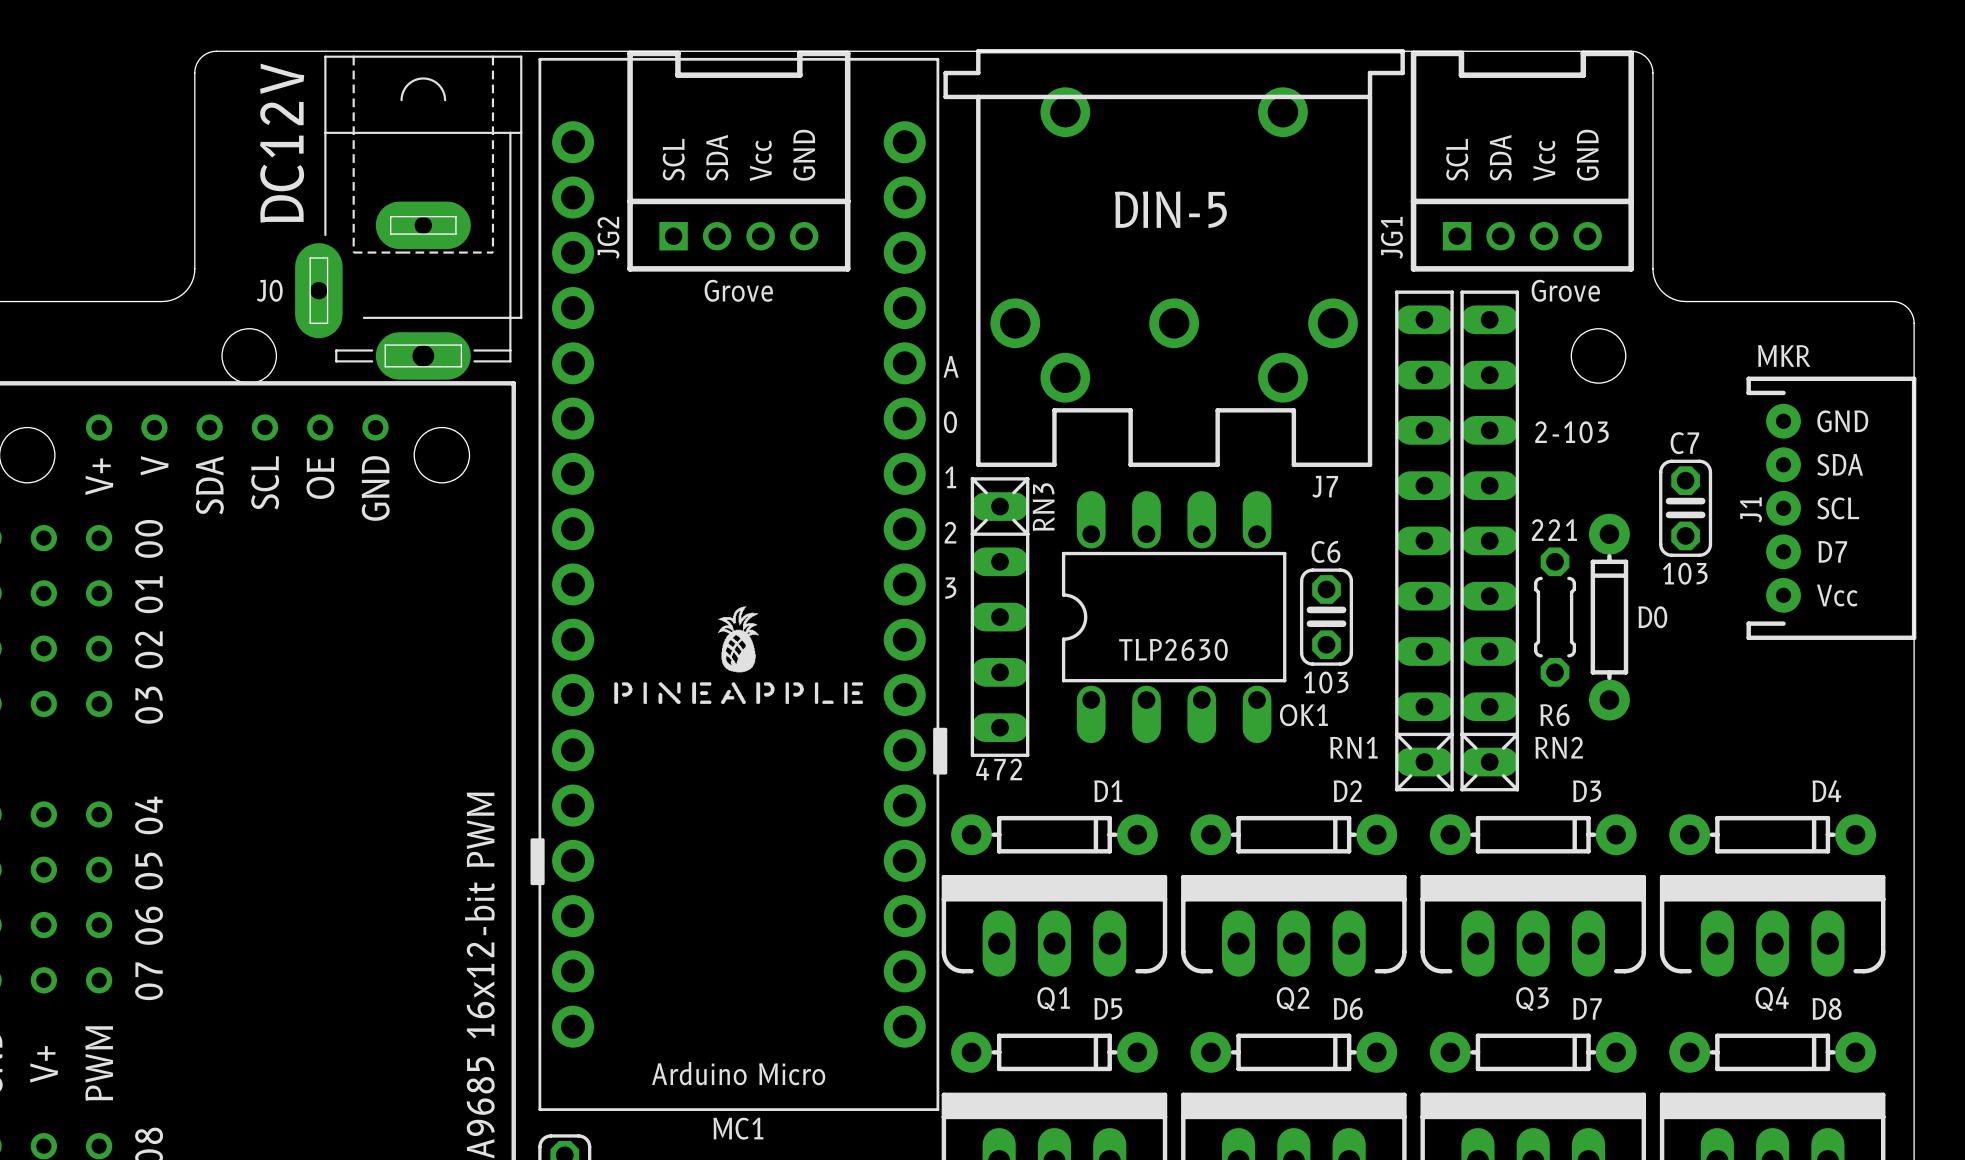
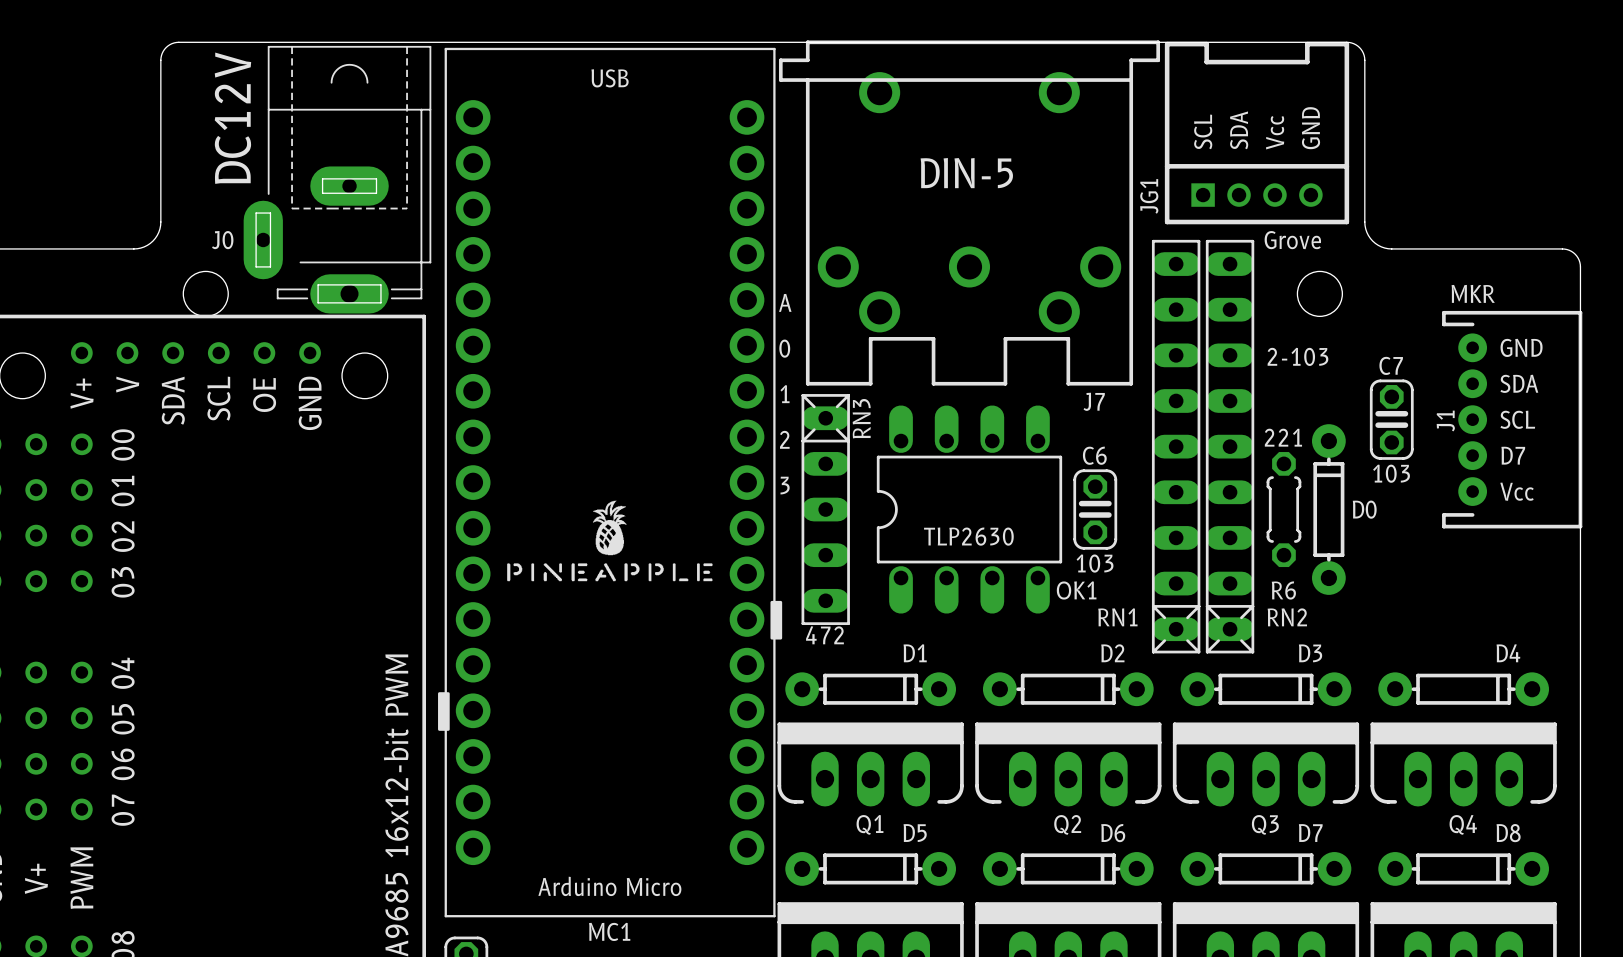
text: none -> USB (610, 78)
text: GND (804, 155) -> none
text: SDA (717, 157) -> none
text: SCL (673, 159) -> none
text: Vcc (760, 160) -> none
JG2: (738, 161) -> none
text: Grove (738, 290) -> none

